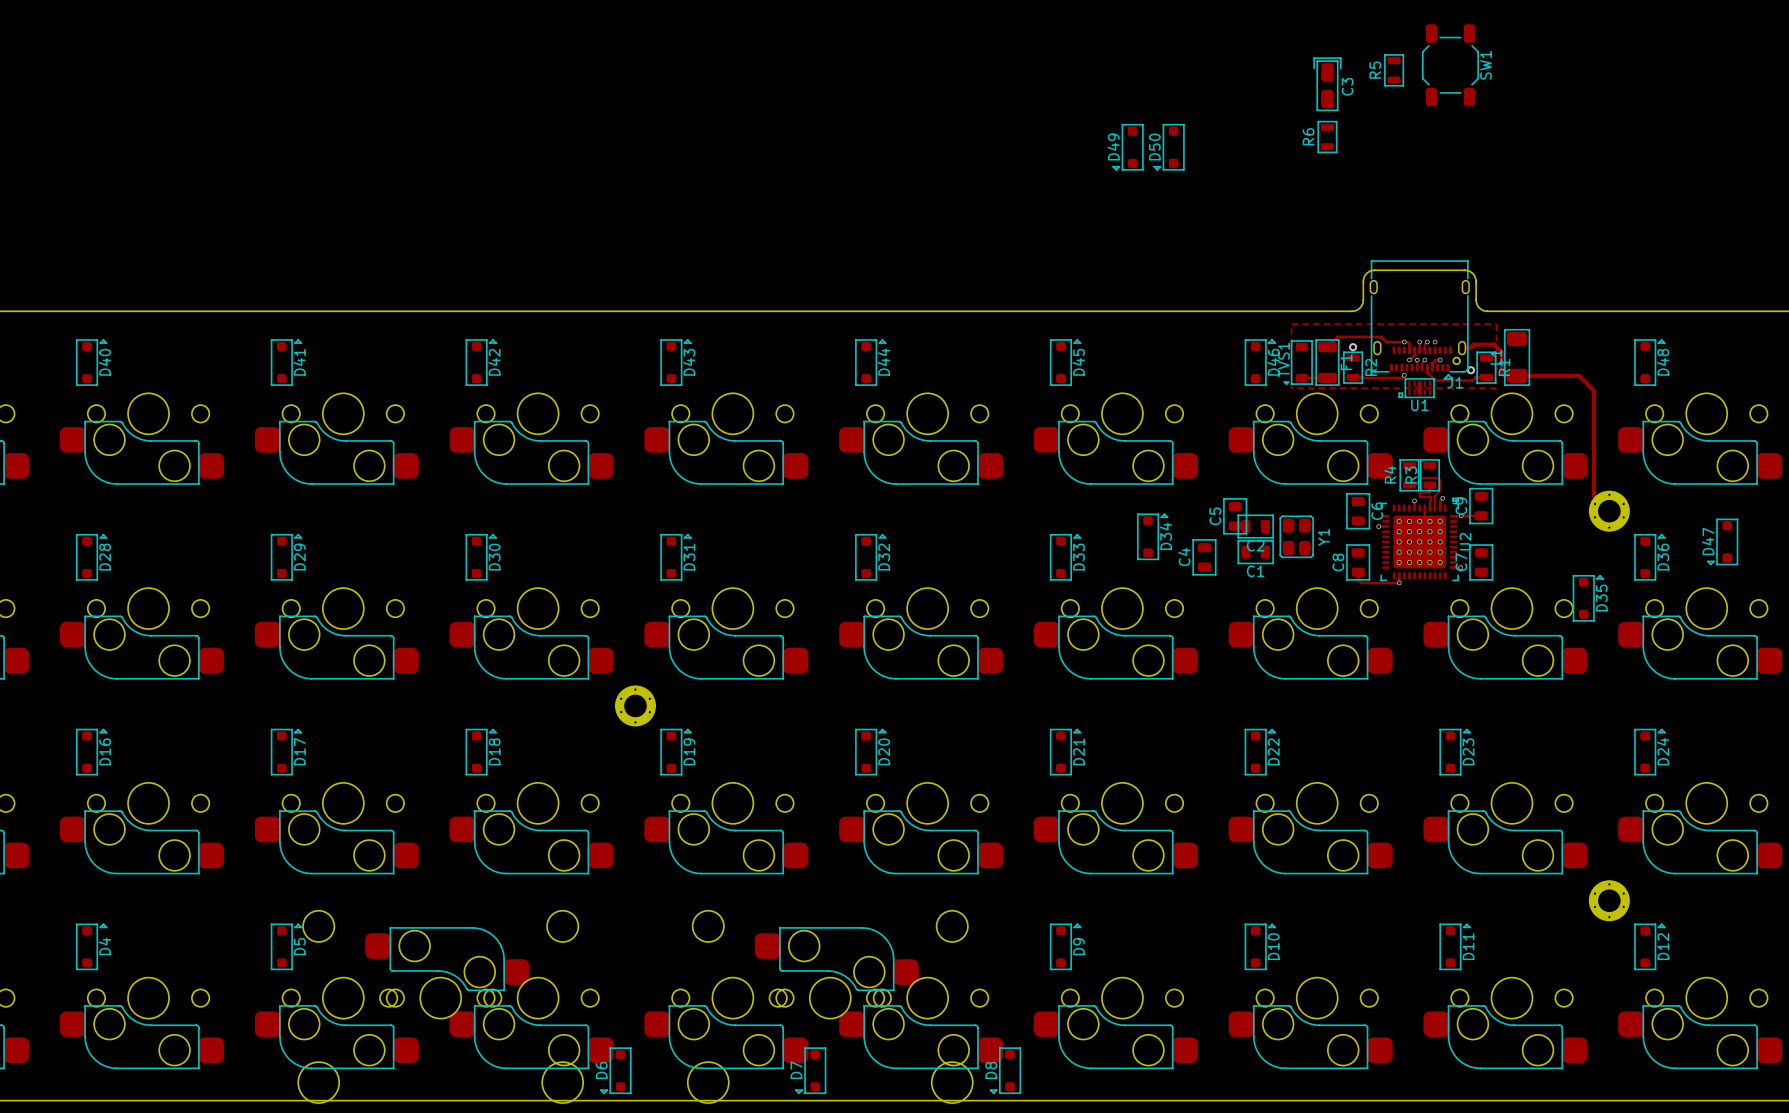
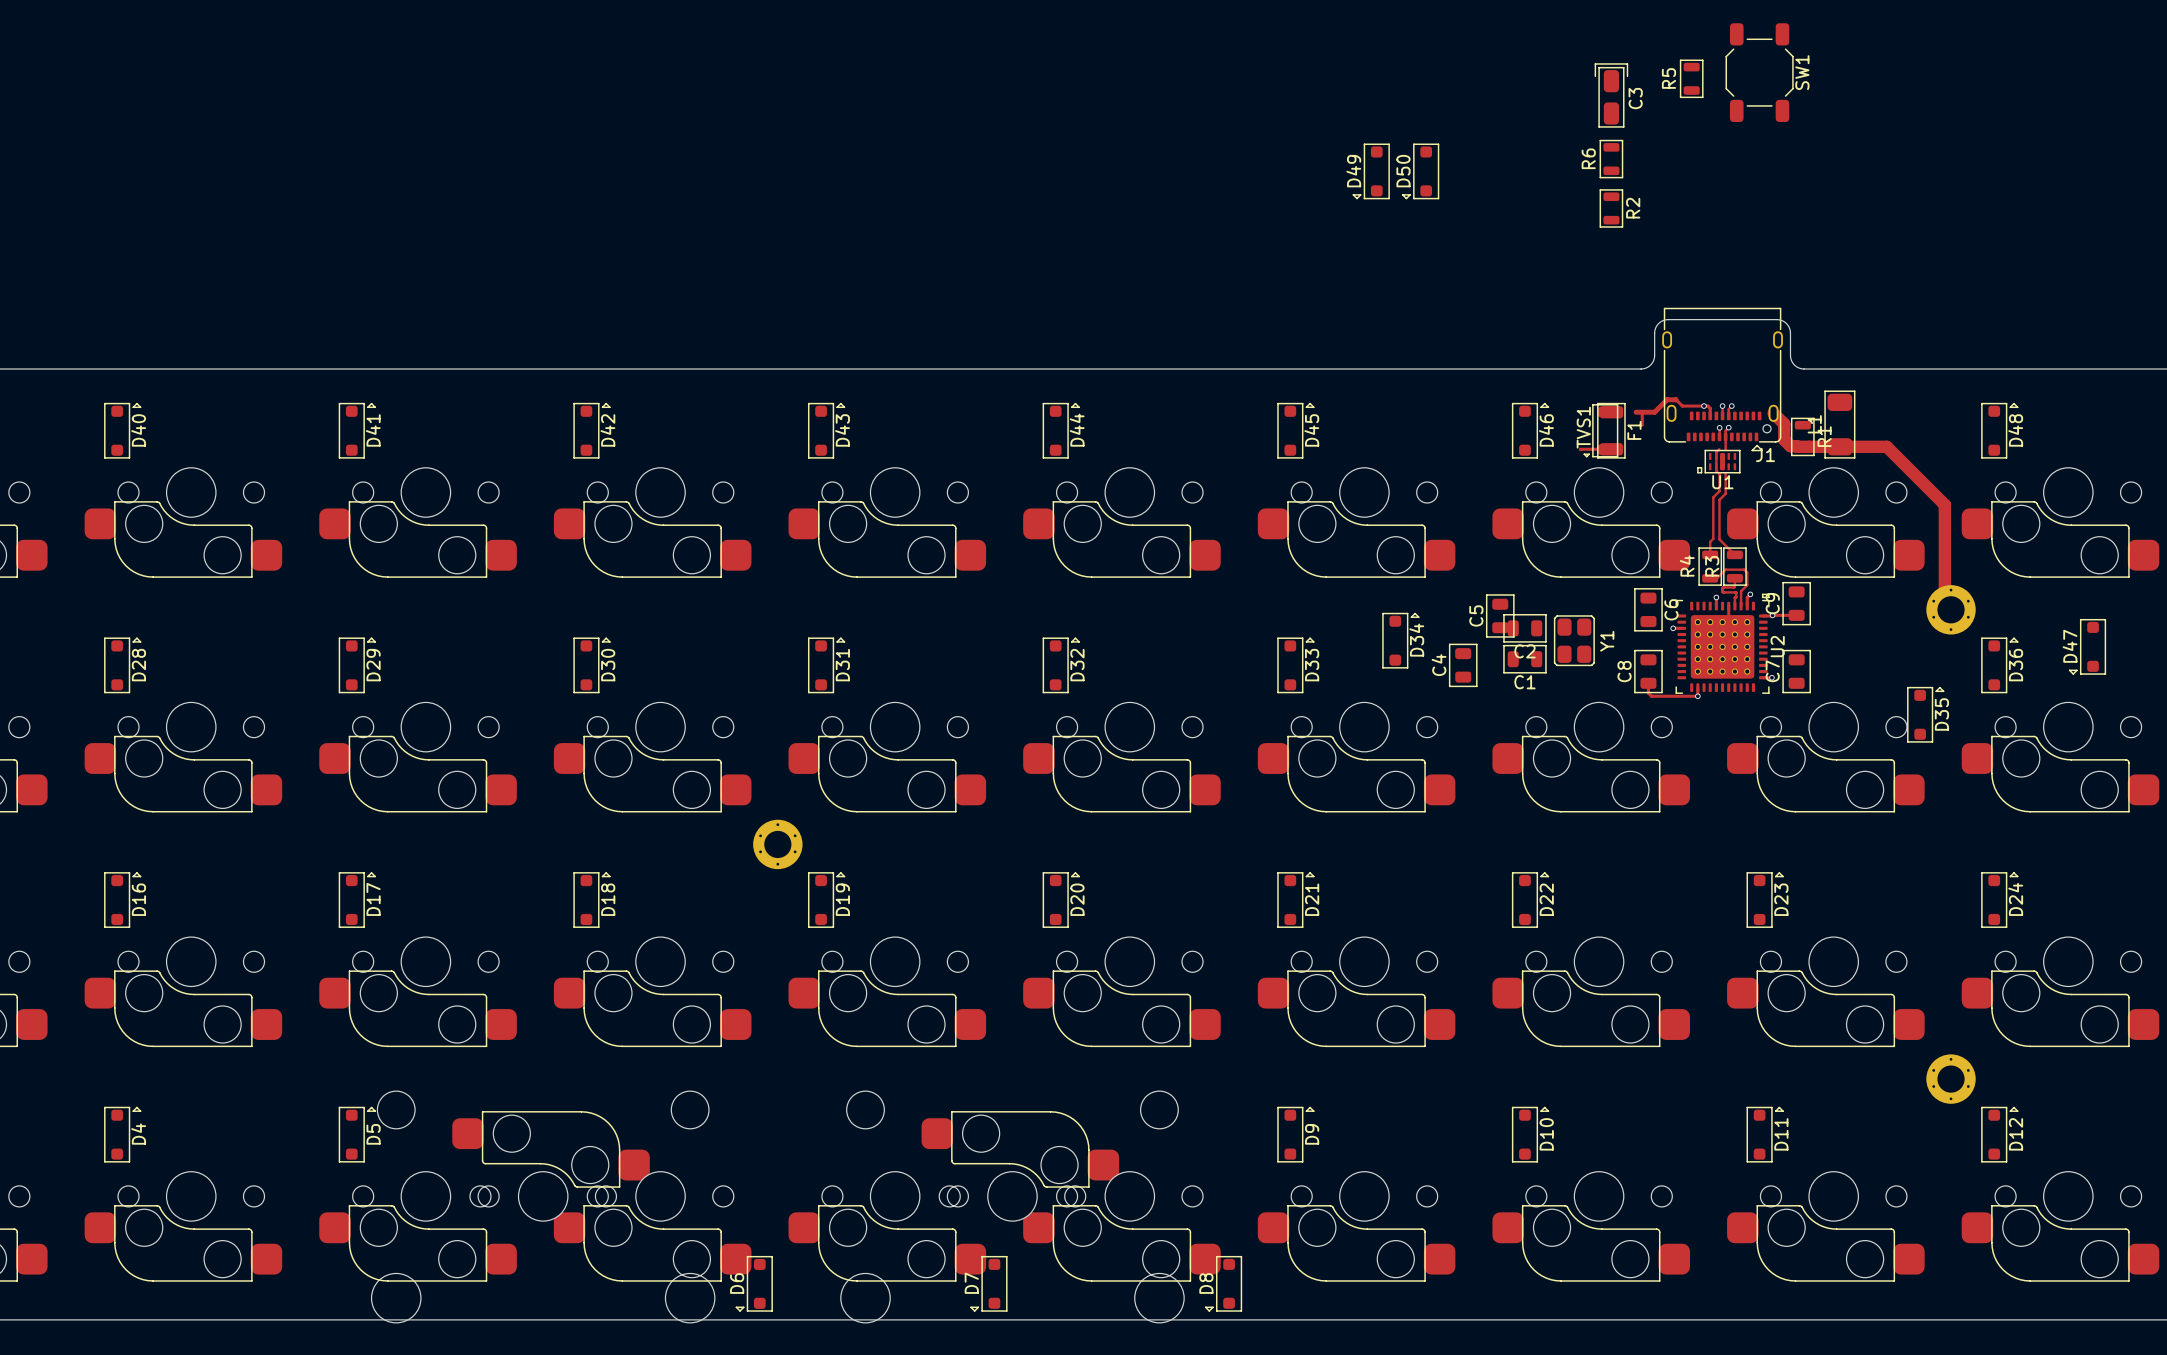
zone outline: (1291, 324) (1496, 324) (1496, 388) (1291, 388) (1291, 324) -> none
track: (1380, 336) (1337, 336) (1327, 347) -> (1675, 399) (1667, 399) (1654, 412) (1636, 412)
via: (1435, 342) -> none
via: (1353, 347) -> none
track: (1462, 348) (1470, 348) (1473, 344) (1494, 344) (1501, 352) (1501, 372) (1504, 375) -> (1773, 413) (1784, 424) (1784, 440) (1790, 446) (1825, 446)
track: (1414, 350) (1414, 354) (1409, 359) -> none
via: (1409, 359) -> none
track: (1440, 359) (1435, 359) (1432, 363) (1432, 367) -> none
via: (1440, 359) -> none
TVS1 position: (1298, 362) -> (1600, 430)
R2 position: (1353, 367) -> (1611, 208)
track: none -> (1725, 436) (1725, 449)
track: (1427, 367) (1427, 372) (1435, 380) (1472, 380) (1475, 377) (1486, 377) -> none
via: (1470, 370) -> none
track: (1404, 375) (1401, 377) (1353, 377) -> none
via: (1404, 375) -> none
track width: thin (1504, 375) (1556, 375) -> thick (1825, 446) (1886, 446)
track: (1556, 375) (1579, 375) (1593, 390) (1593, 495) (1604, 506) -> (1886, 446) (1944, 504) (1944, 603)
track: none -> (1719, 449) (1716, 452) (1716, 471) (1719, 473)
track: none -> (1719, 473) (1719, 491) (1713, 497) (1713, 538) (1710, 541) (1710, 554)
track: none -> (1725, 473) (1725, 493) (1719, 499) (1719, 539) (1734, 554)

